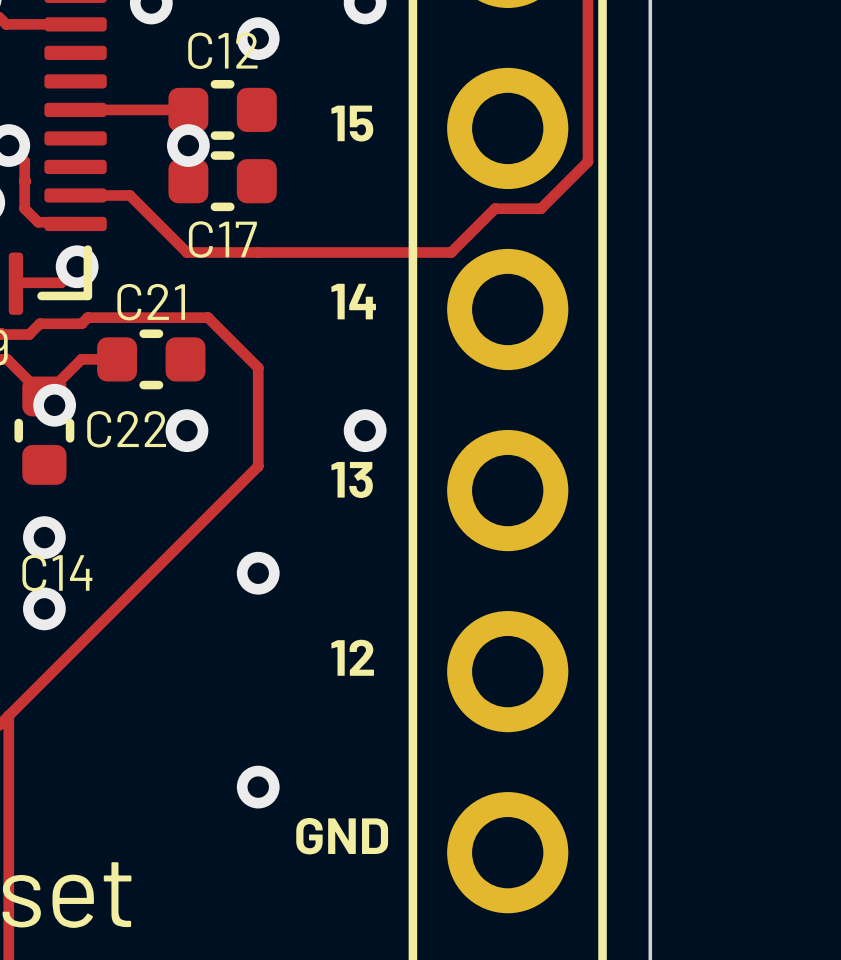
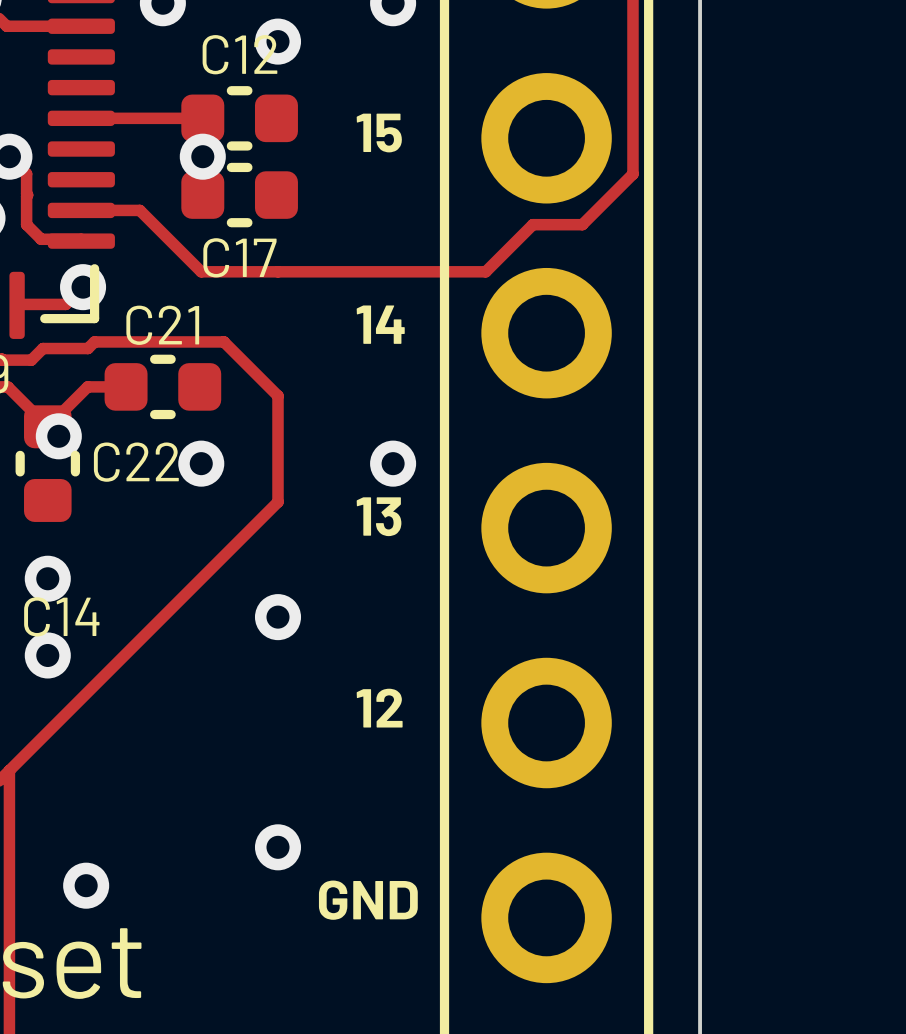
via: none -> (86, 885)

